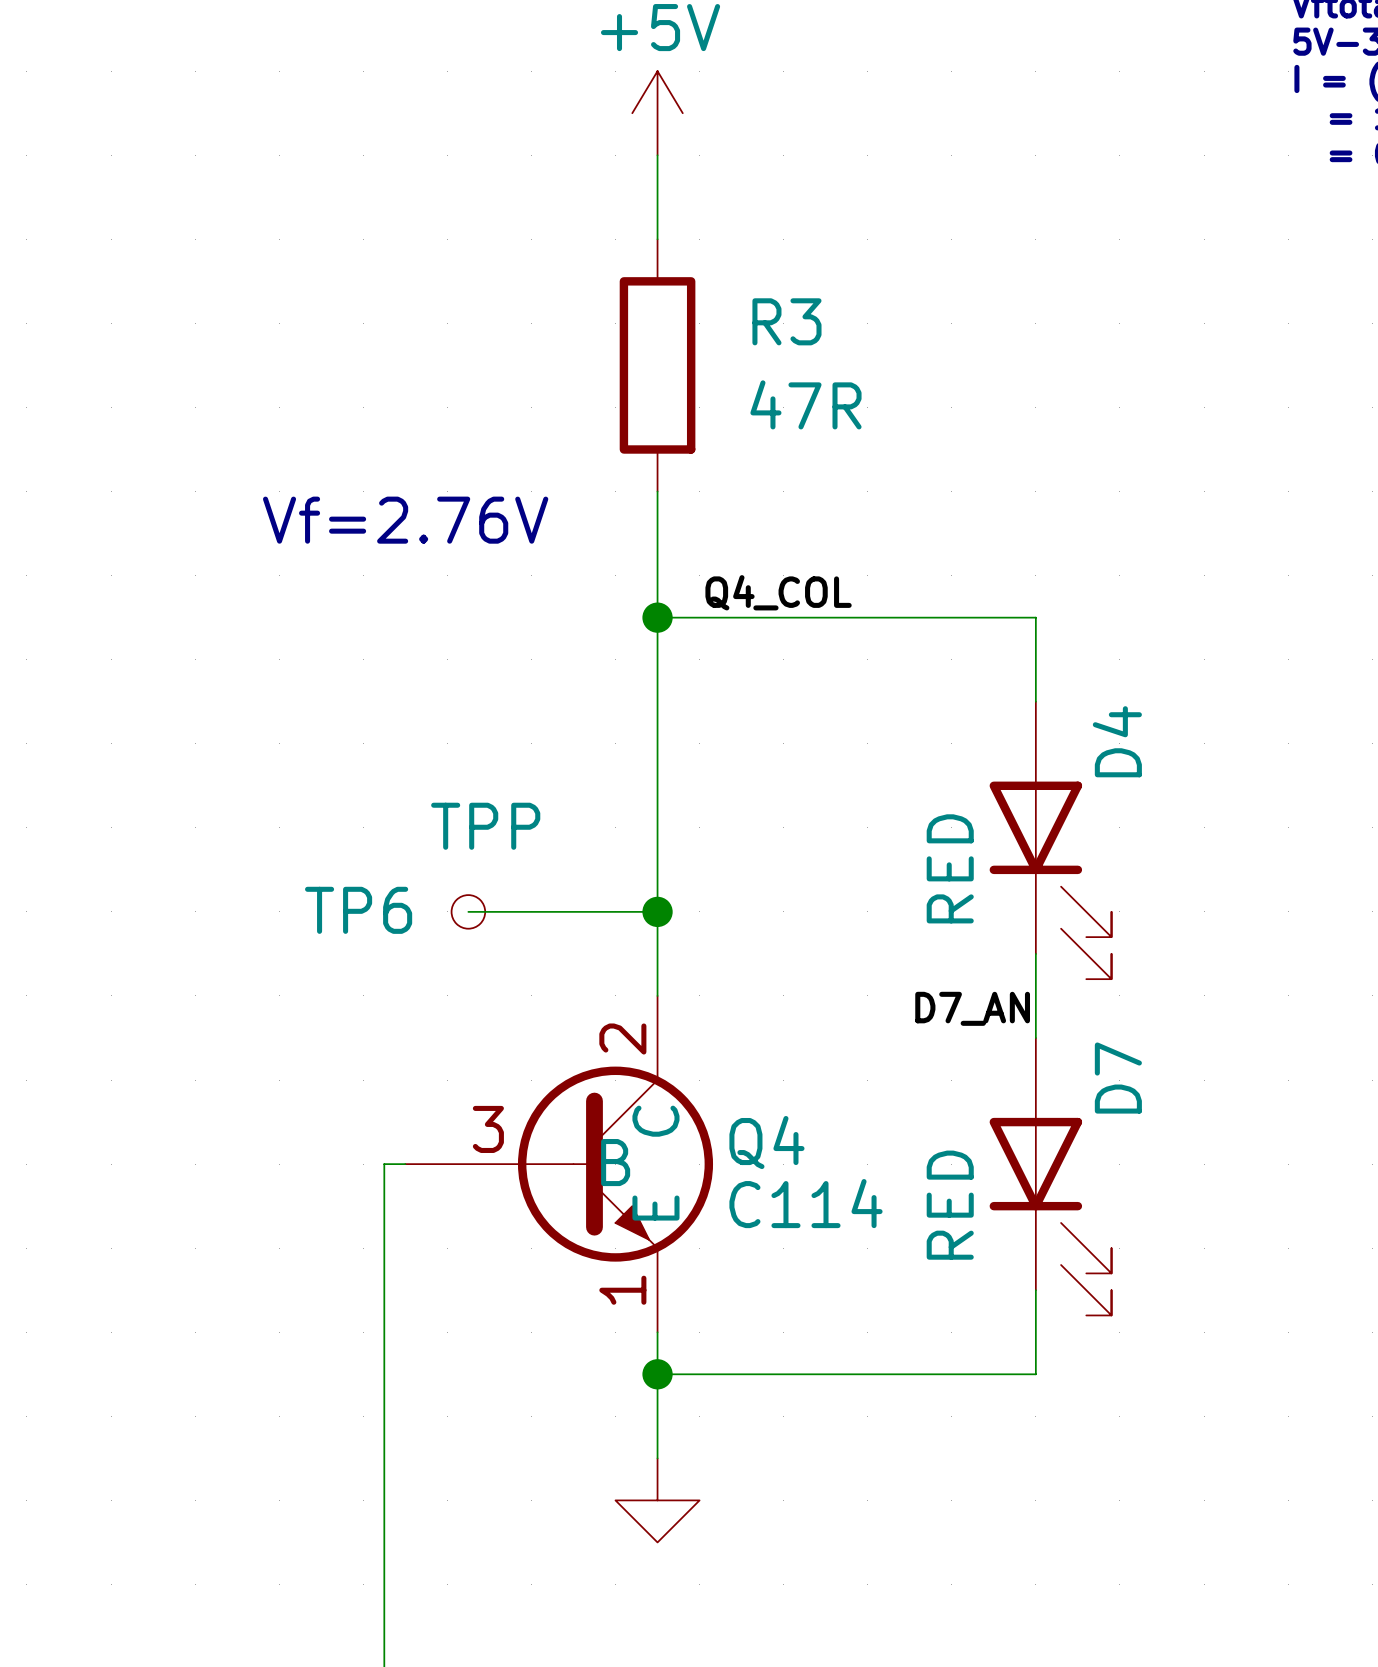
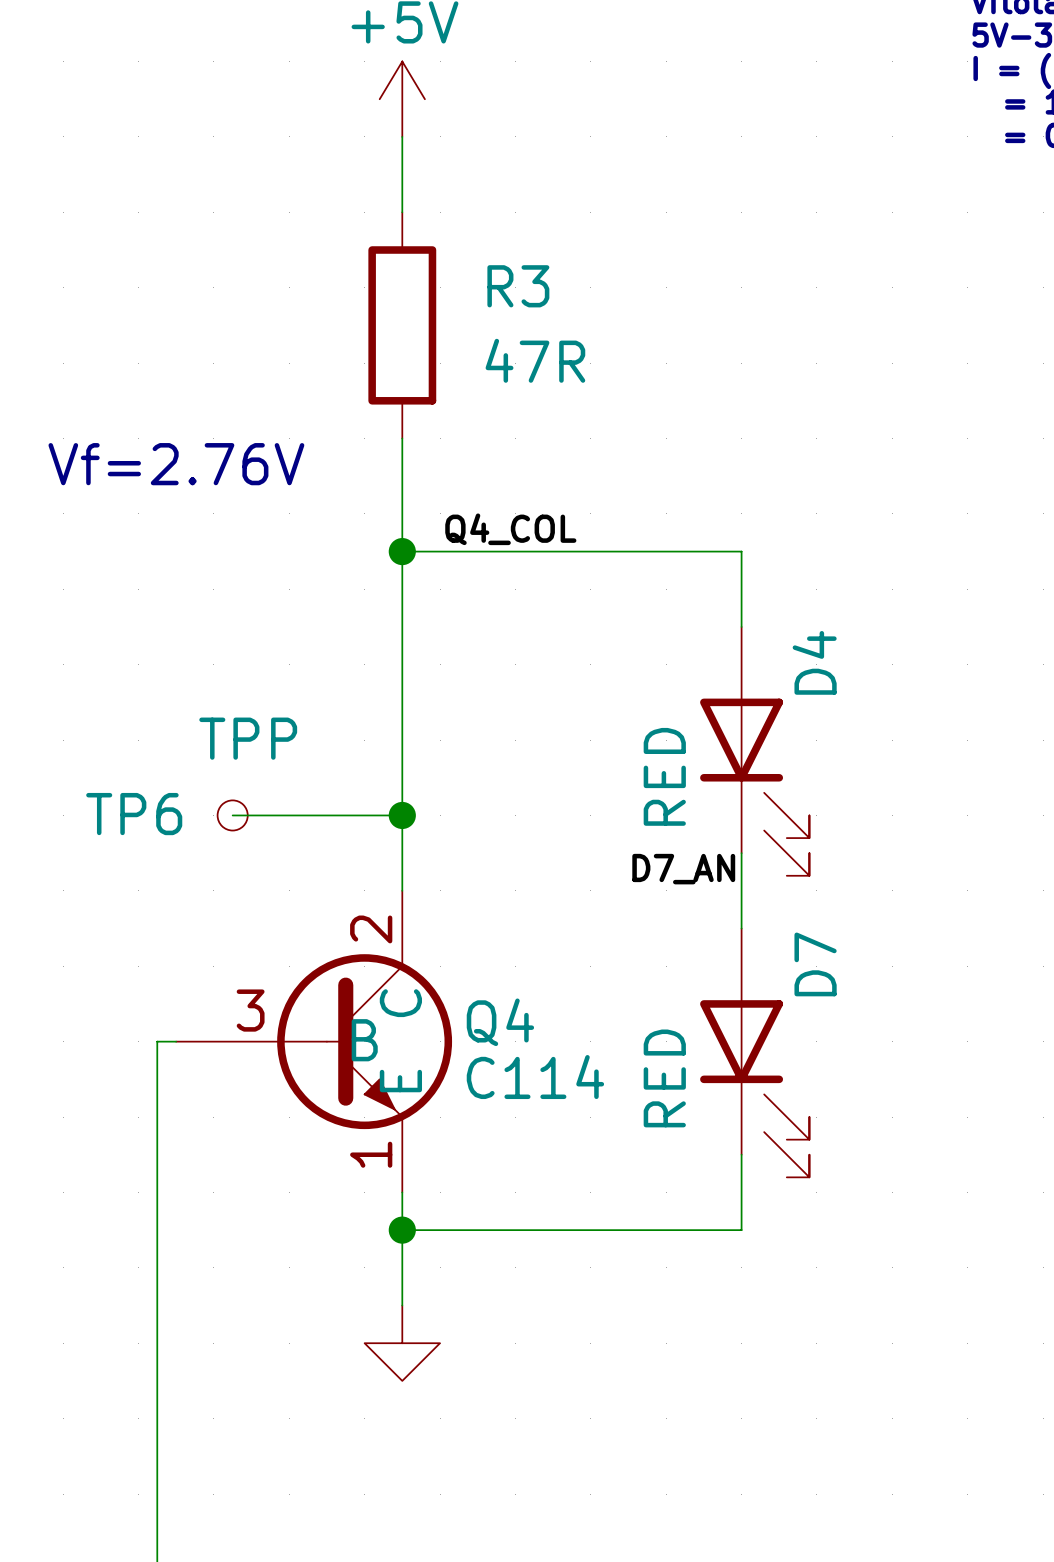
label position: D7_AN (972, 1008) -> D7_AN (683, 869)

